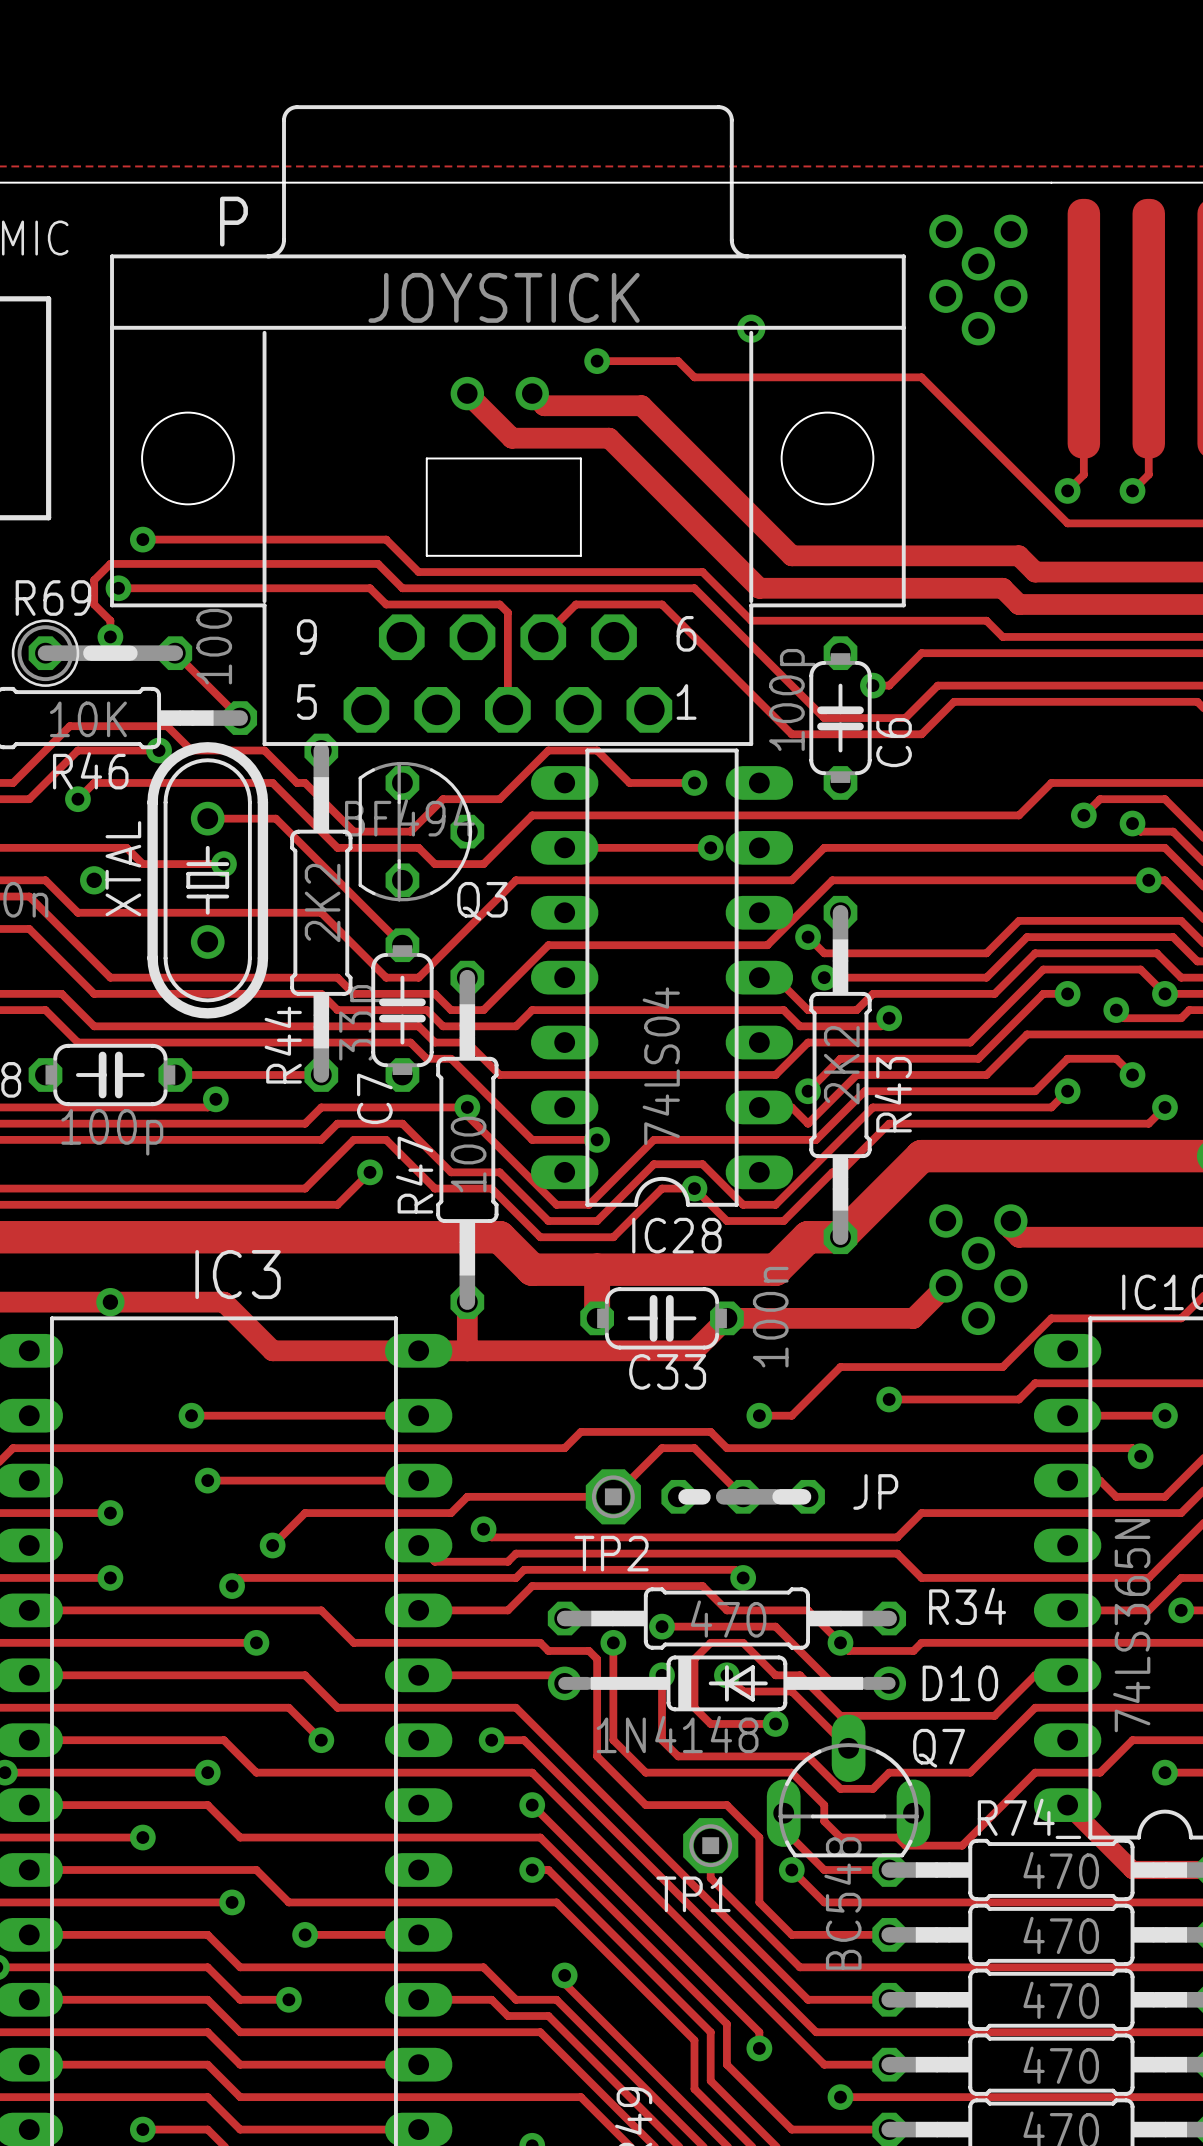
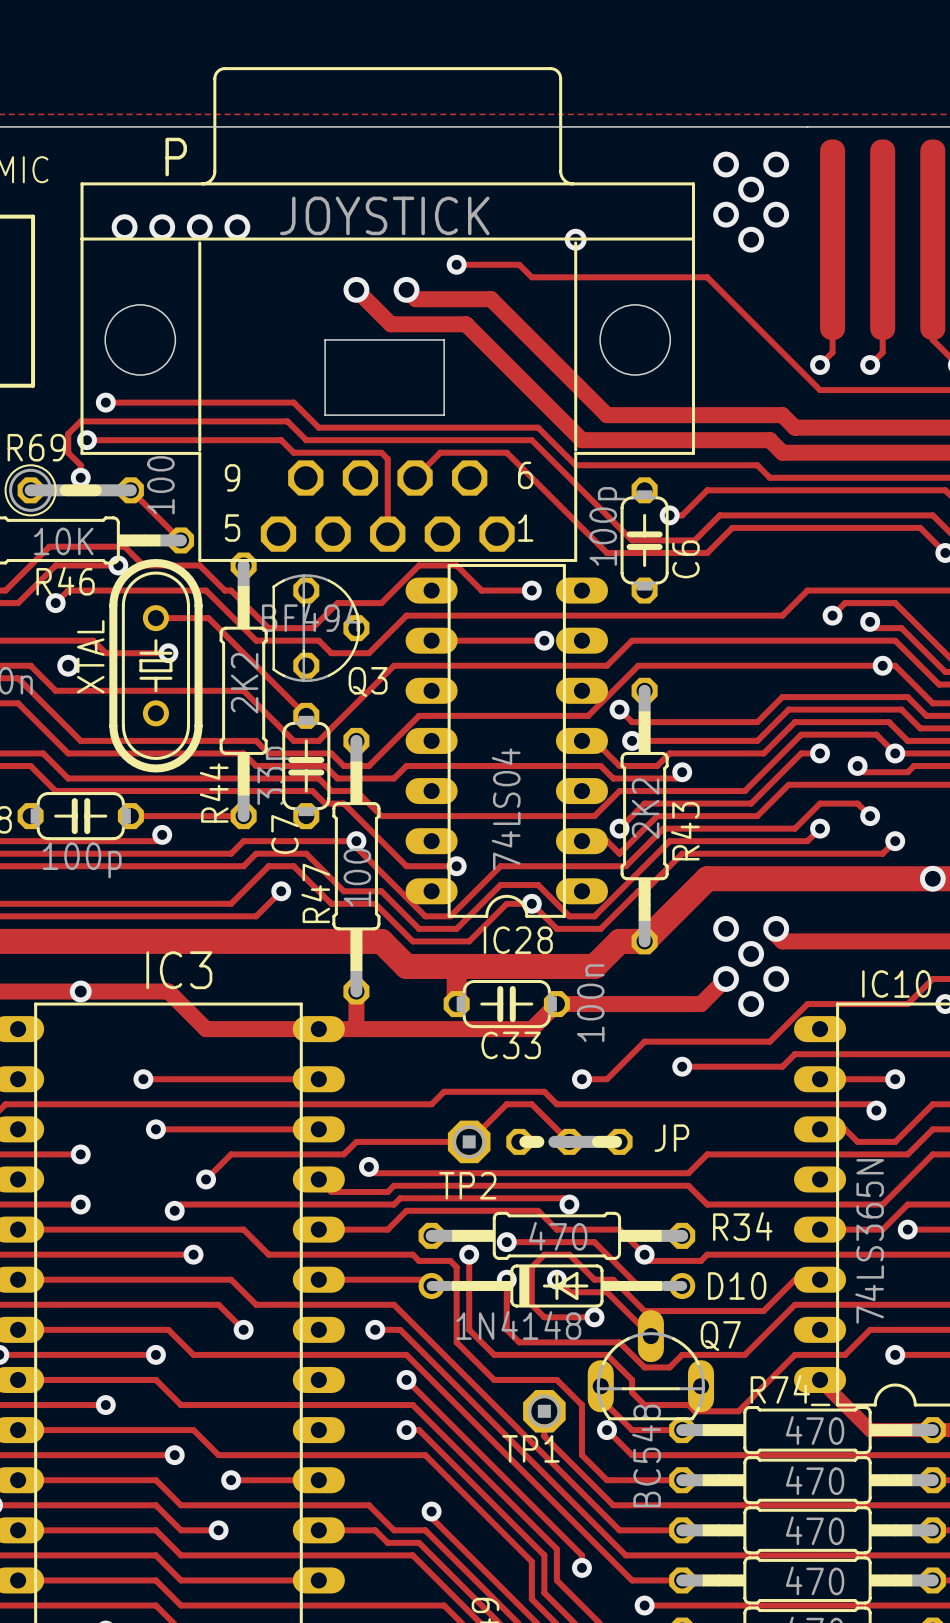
P footprint: [110, 105, 906, 746] -> [80, 67, 695, 562]
via: none -> (124, 227)
via: none -> (162, 227)
via: none -> (199, 227)
via: none -> (237, 227)

